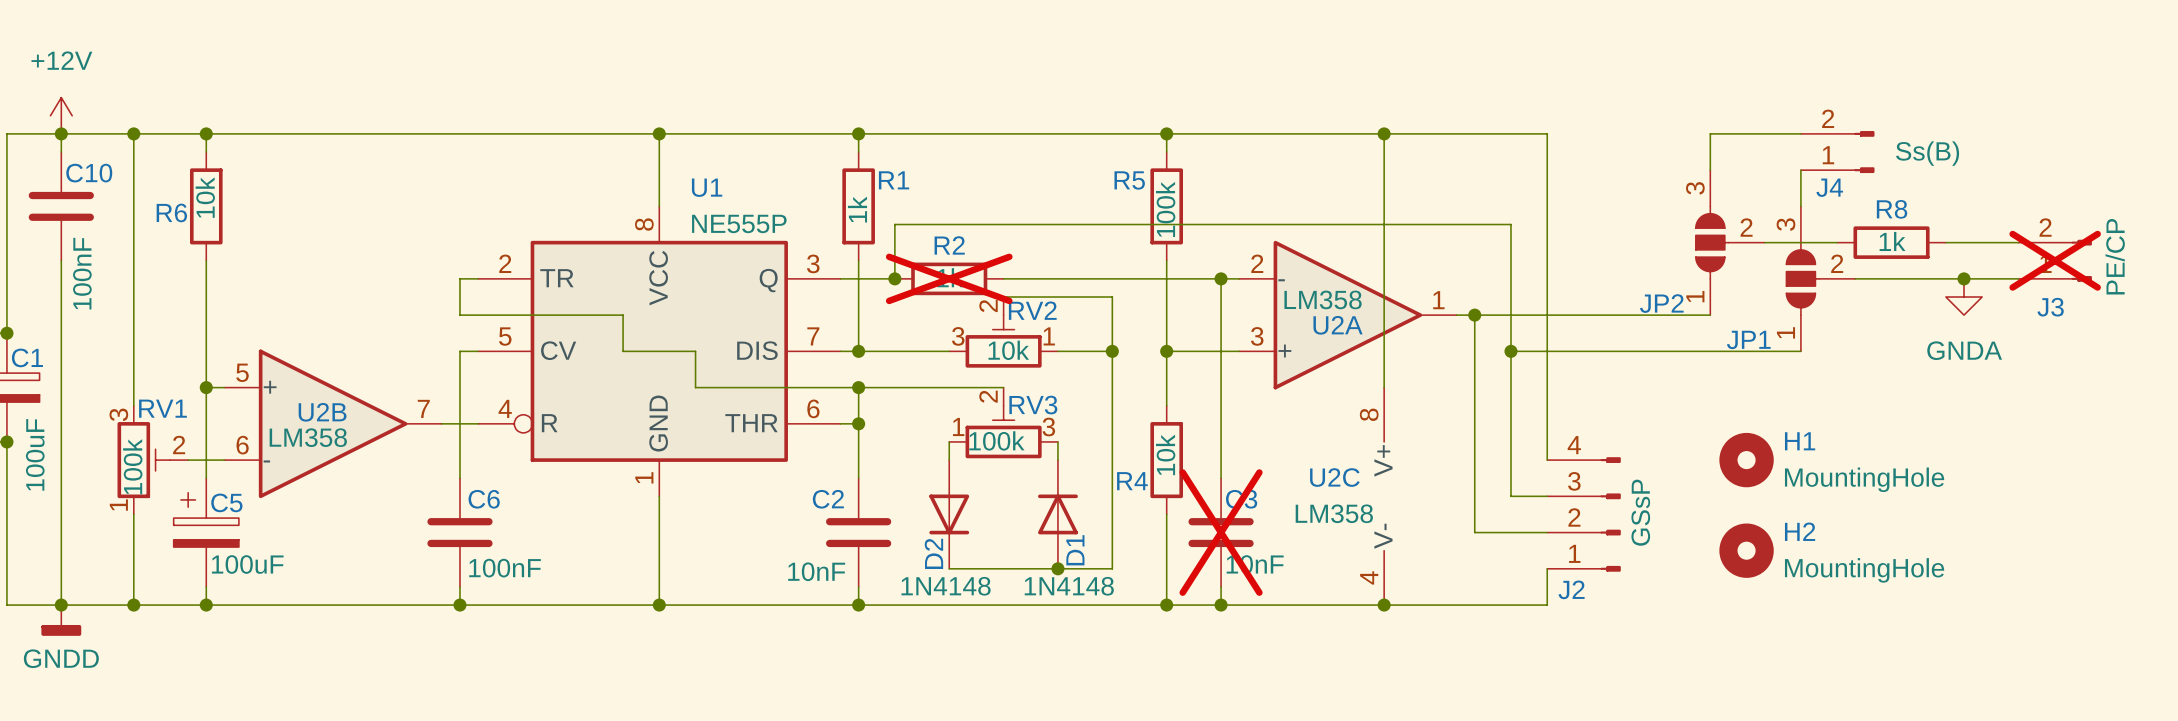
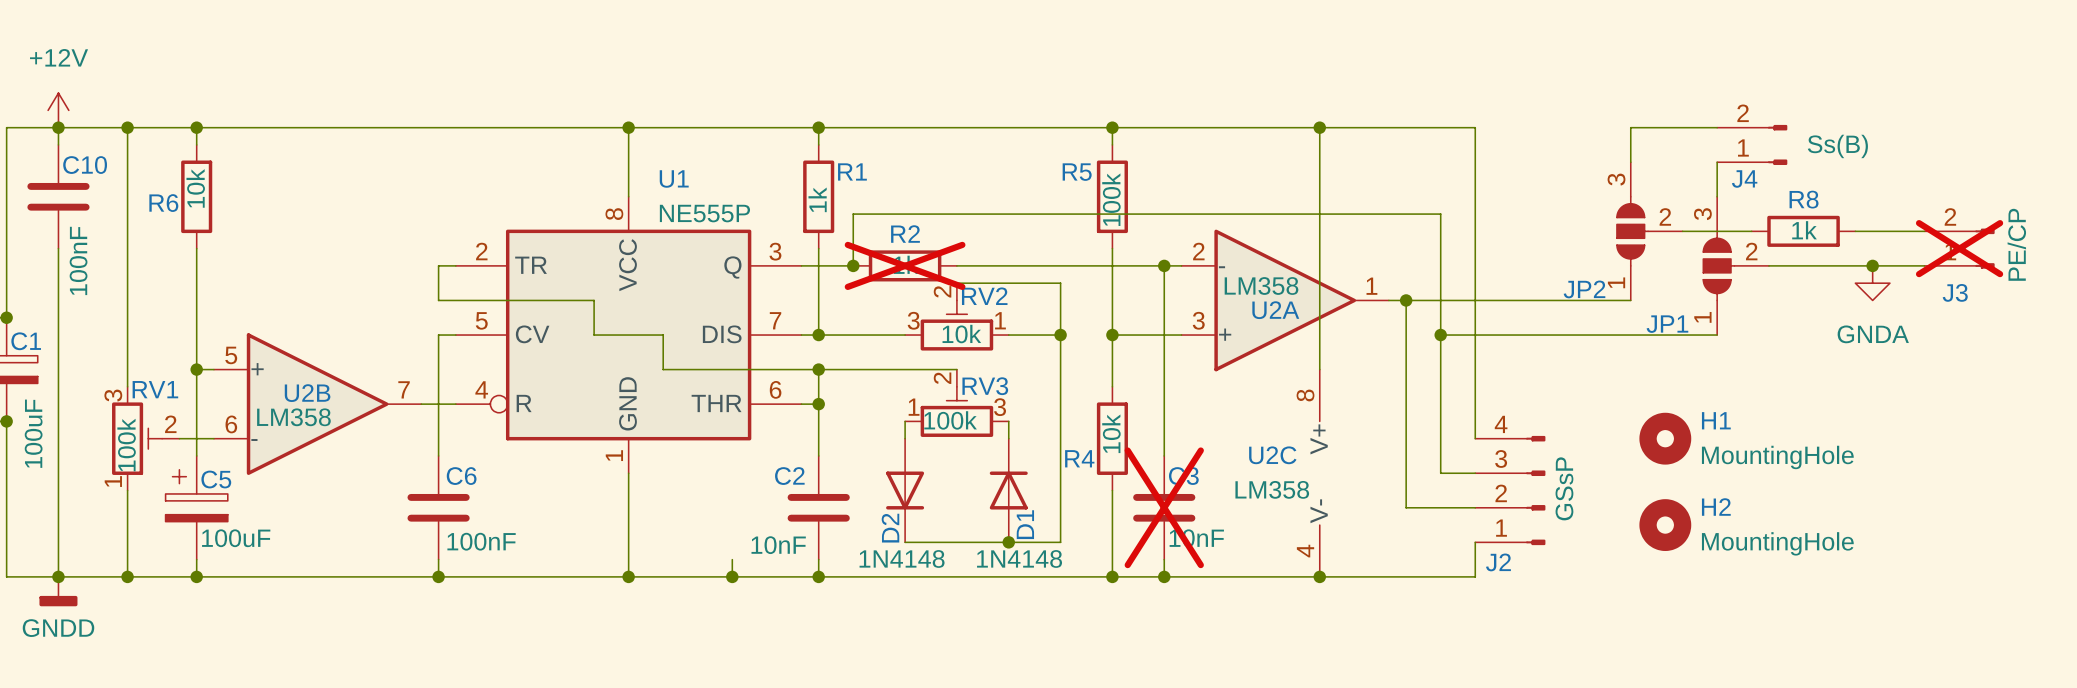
wire: none -> (732, 559) (732, 576)
junction: none -> (732, 576)

